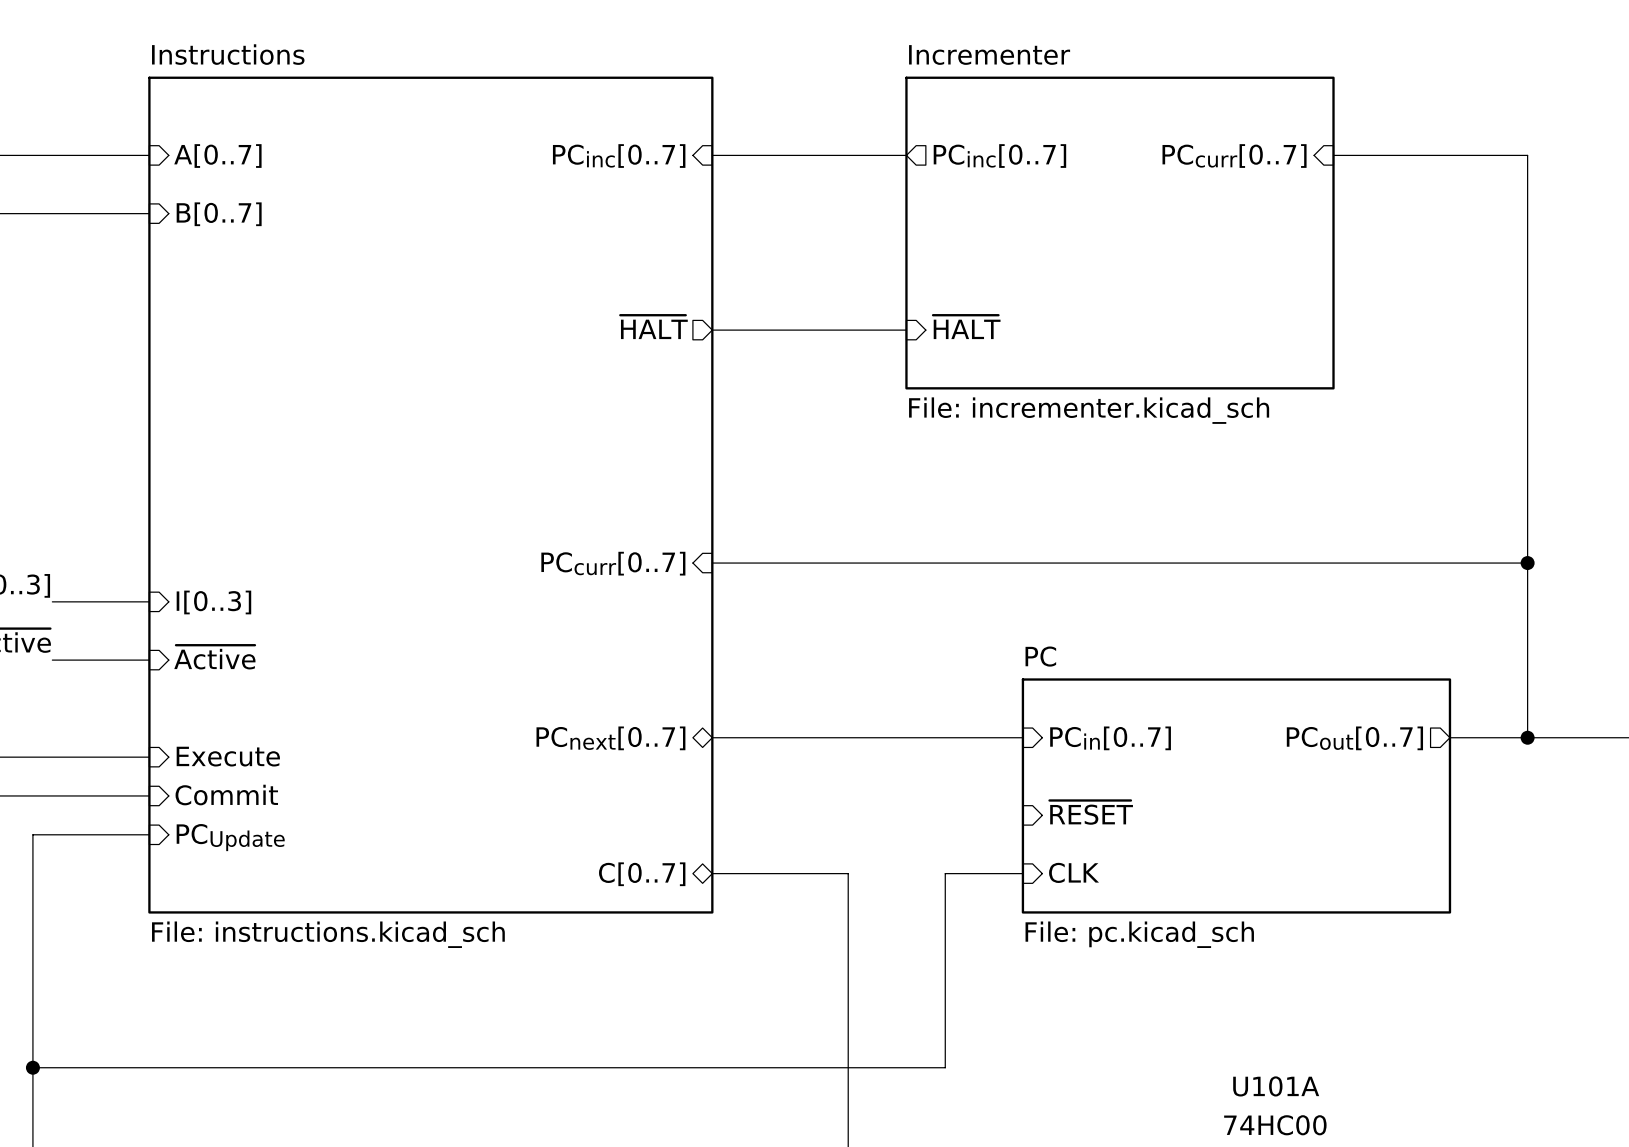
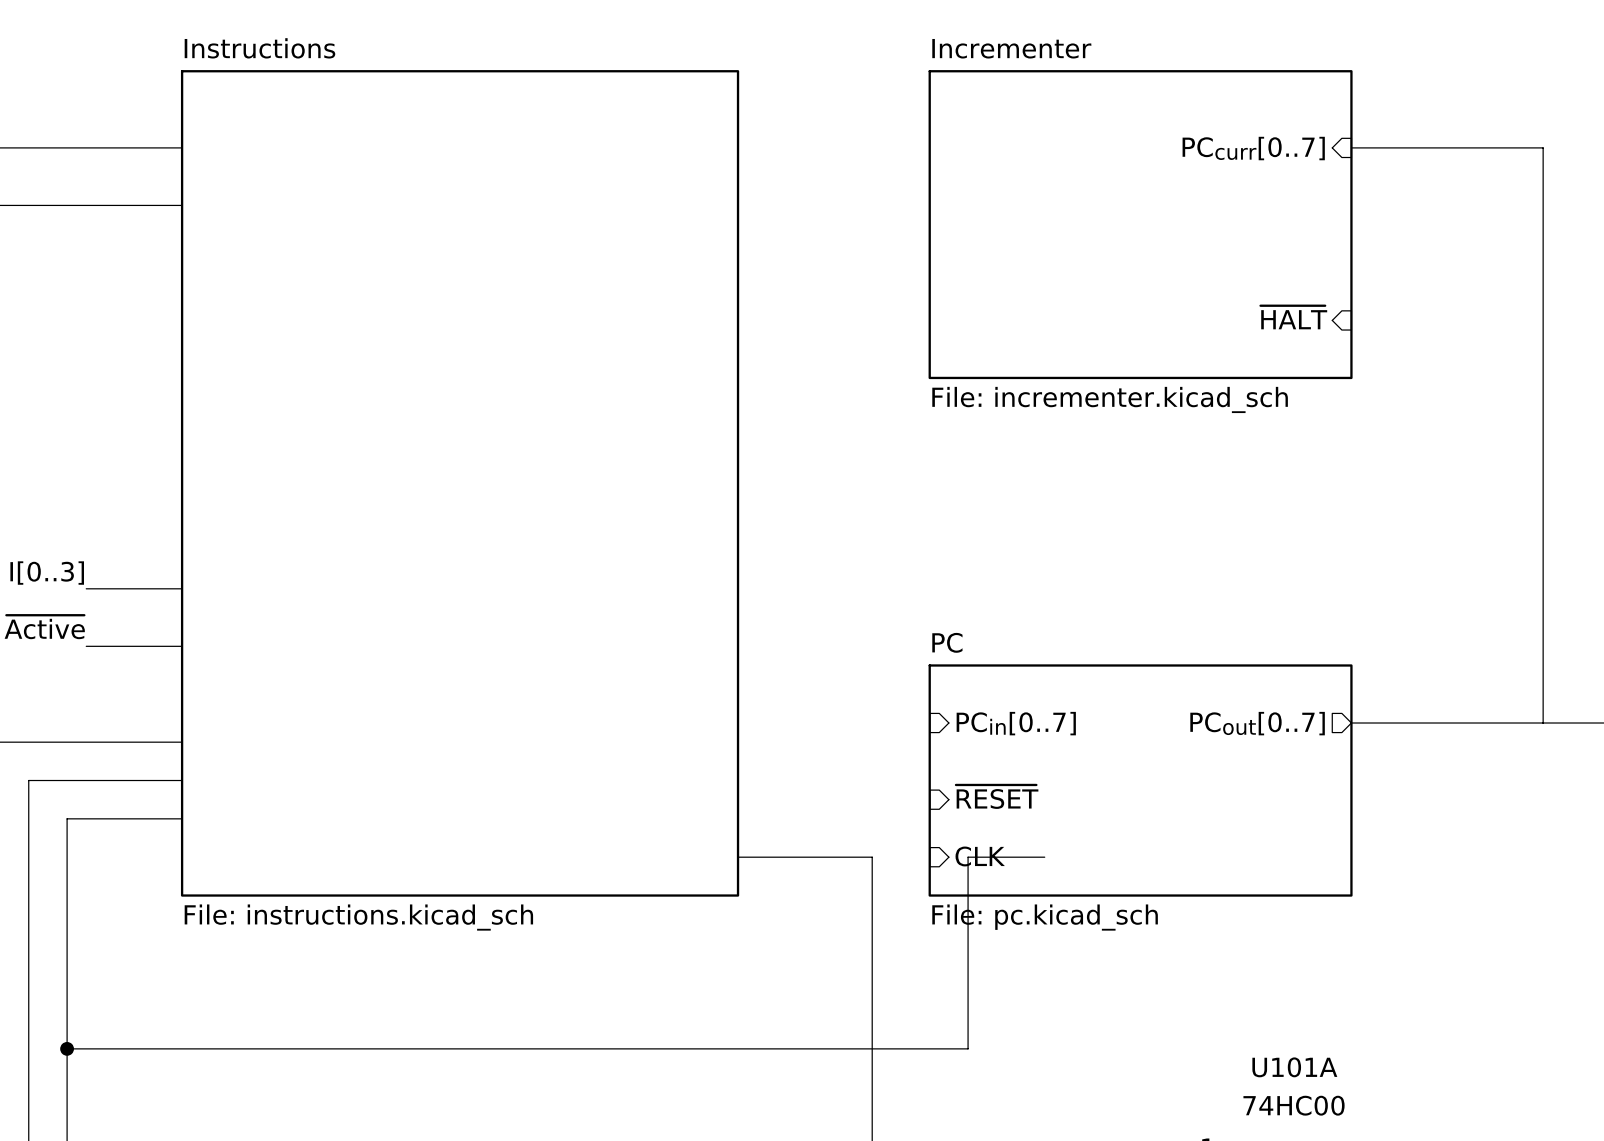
bus: (712, 155) (906, 155) -> none
sheet pin: A[0..7] (217, 156) -> none
sheet pin: PCinc[0..7] (619, 156) -> none
sheet pin: PCinc[0..7] (999, 156) -> none
sheet pin: B[0..7] (219, 214) -> none
sheet pin: ~{HALT} (654, 327) -> none
sheet pin: ~{HALT} (966, 327) -> none
sheet pin: none -> ~{HALT} (1293, 317)
bus: (712, 330) (906, 330) -> none
sheet pin: PCcurr[0..7] (613, 563) -> none
bus: (712, 563) (1527, 563) -> none
junction: (1527, 563) -> none
sheet pin: I[0..3] (213, 602) -> none
sheet pin: ~{Active} (214, 657) -> none
bus: (712, 737) (1022, 737) -> none
bus: none -> (1351, 723) (1466, 723)
junction: (1527, 737) -> none
sheet pin: PCnext[0..7] (610, 738) -> none
sheet pin position: PCin[0..7] (1110, 738) -> PCin[0..7] (1016, 723)
sheet pin position: PCout[0..7] (1354, 738) -> PCout[0..7] (1257, 723)
sheet pin: Execute (228, 756) -> none
sheet pin: Commit (226, 795) -> none
sheet PC position: (1236, 795) -> (1140, 780)
sheet pin position: ~{RESET} (1091, 812) -> ~{RESET} (997, 796)
sheet pin: PCUpdate (230, 837) -> none
sheet pin position: CLK (1074, 872) -> CLK (980, 856)
sheet pin: C[0..7] (642, 874) -> none

